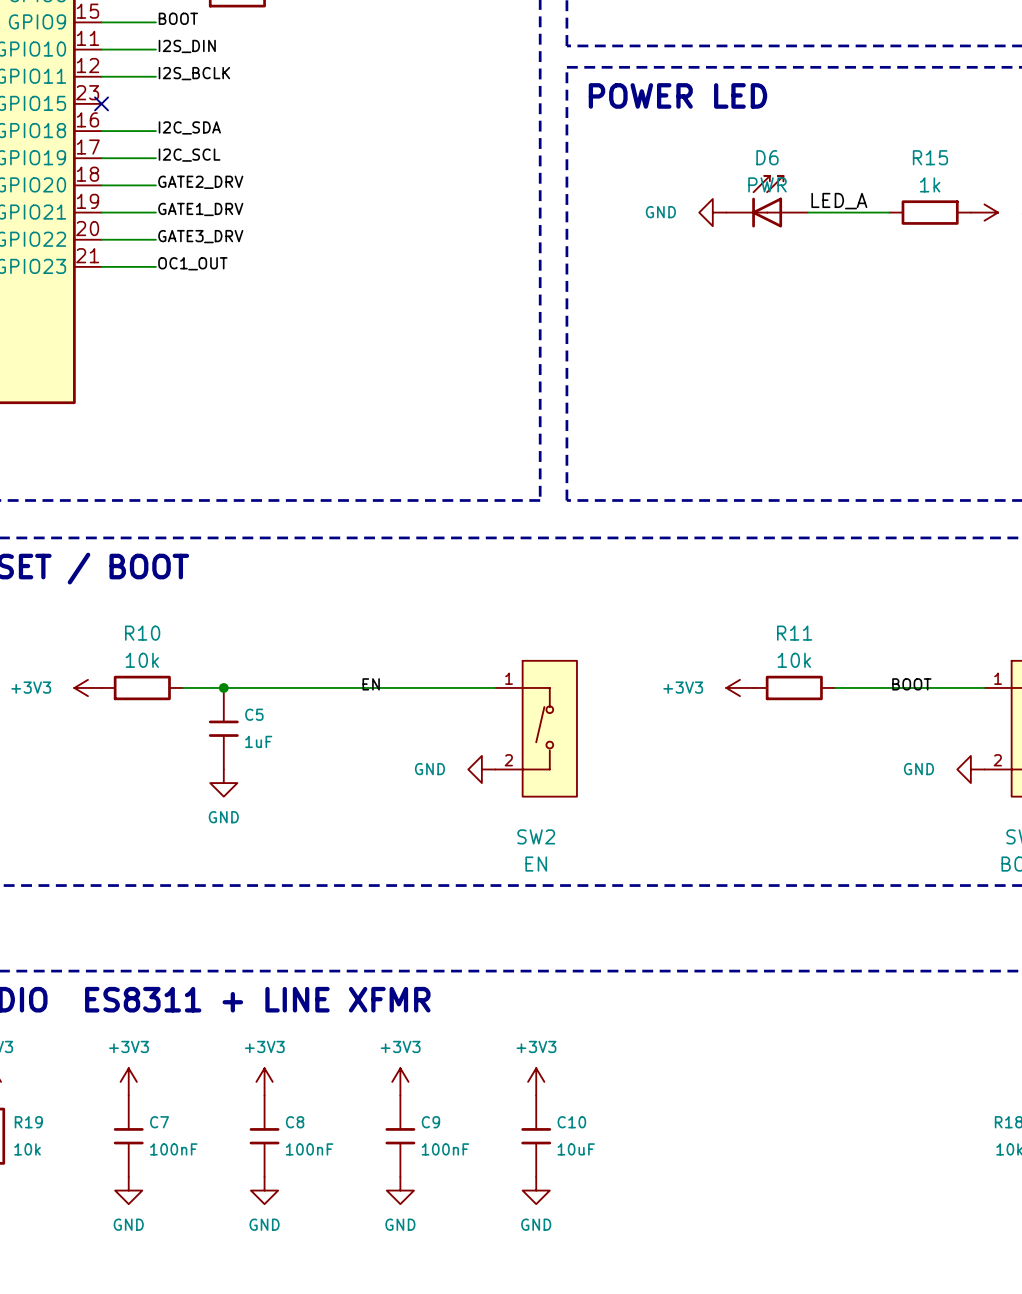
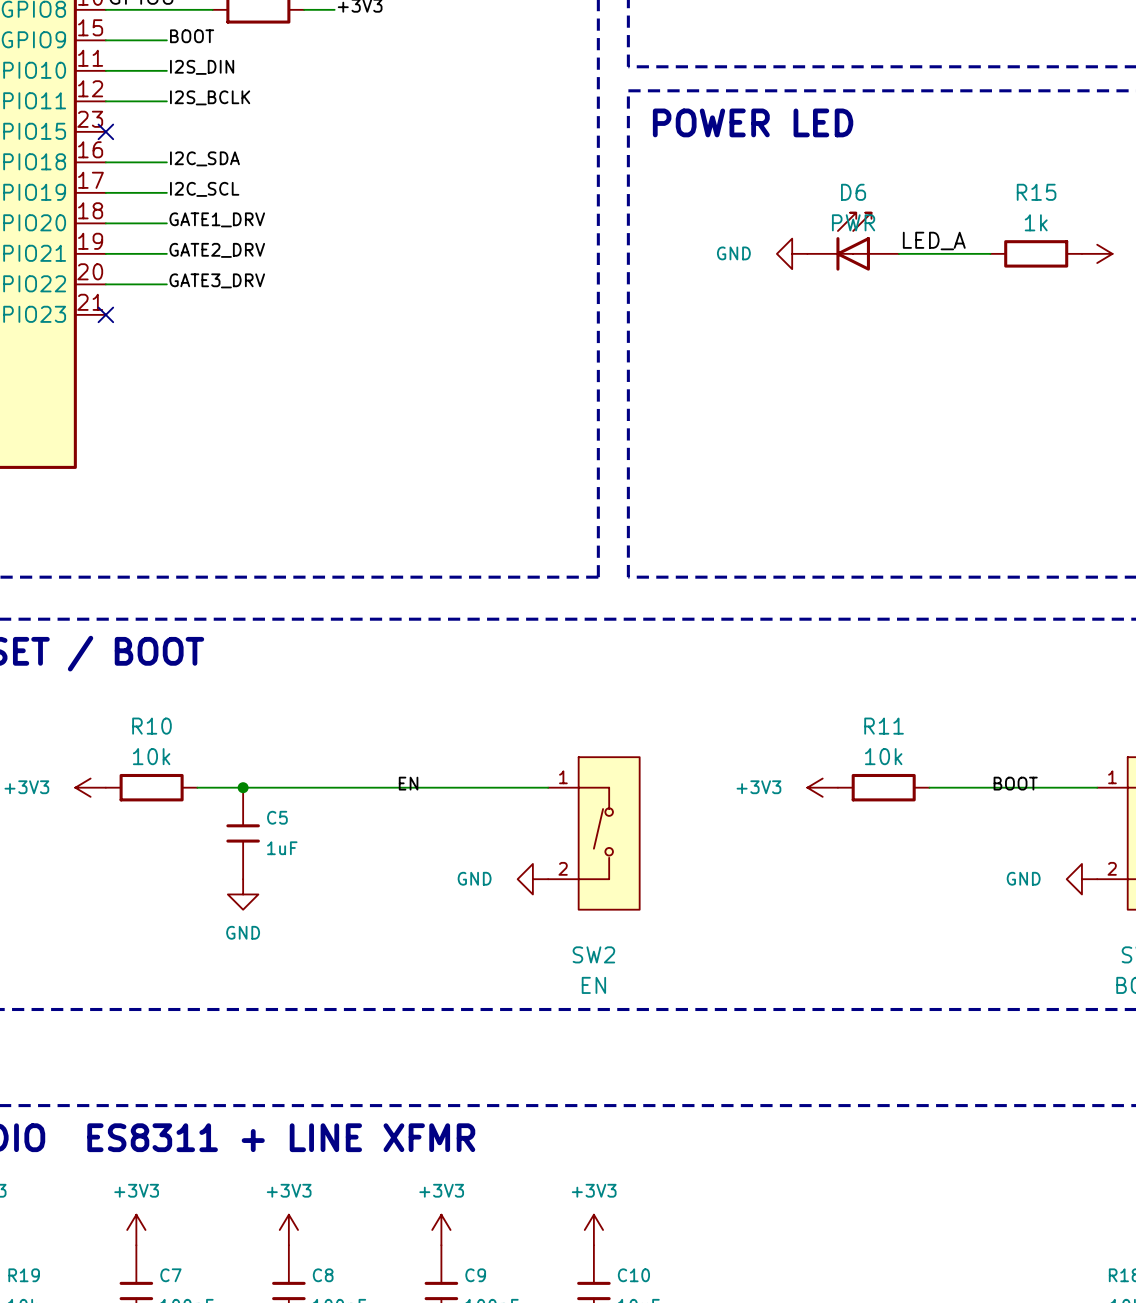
label: GATE2_DRV (200, 182) -> GATE1_DRV (217, 219)
label: GATE1_DRV (200, 209) -> GATE2_DRV (217, 250)
label: OC1_OUT (192, 263) -> none
wire: (101, 266) (155, 266) -> none
no-connect mark: none -> (105, 314)

